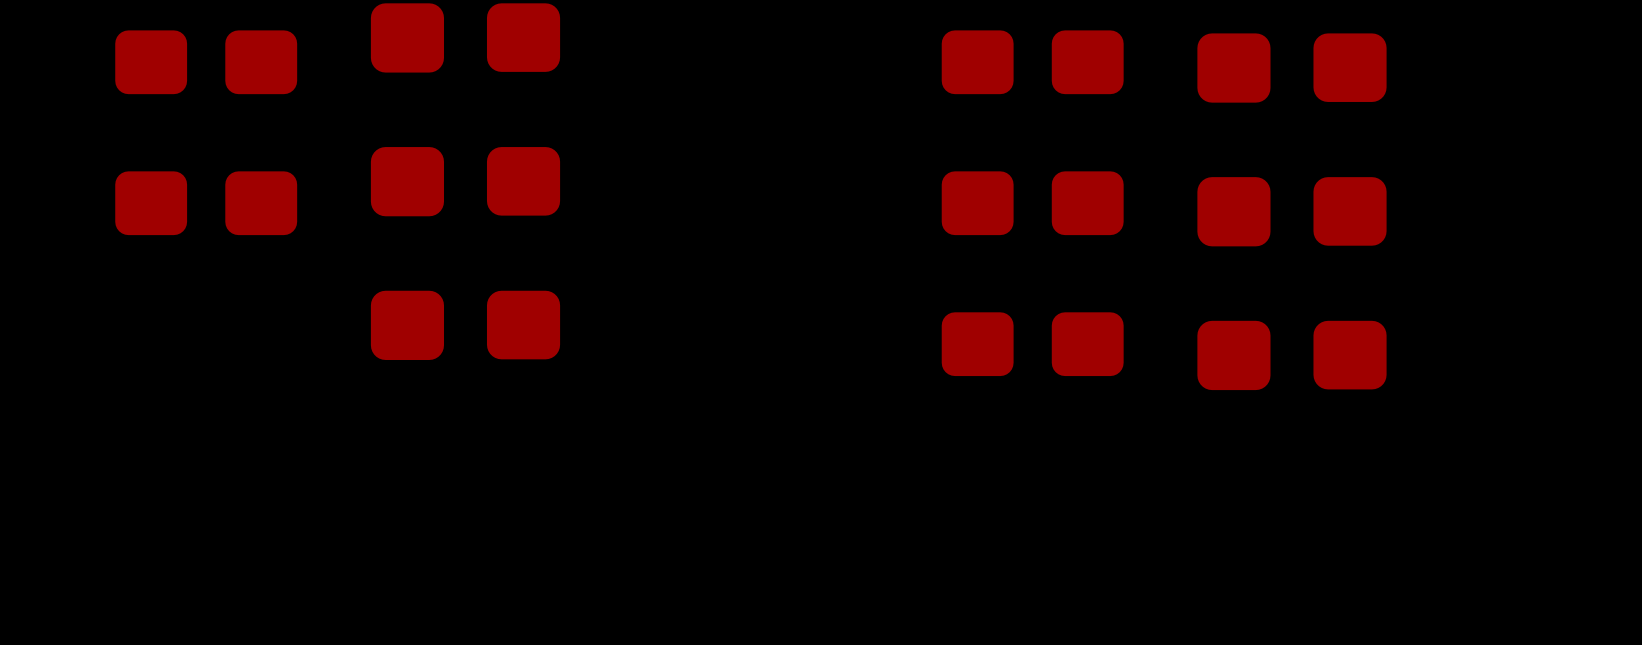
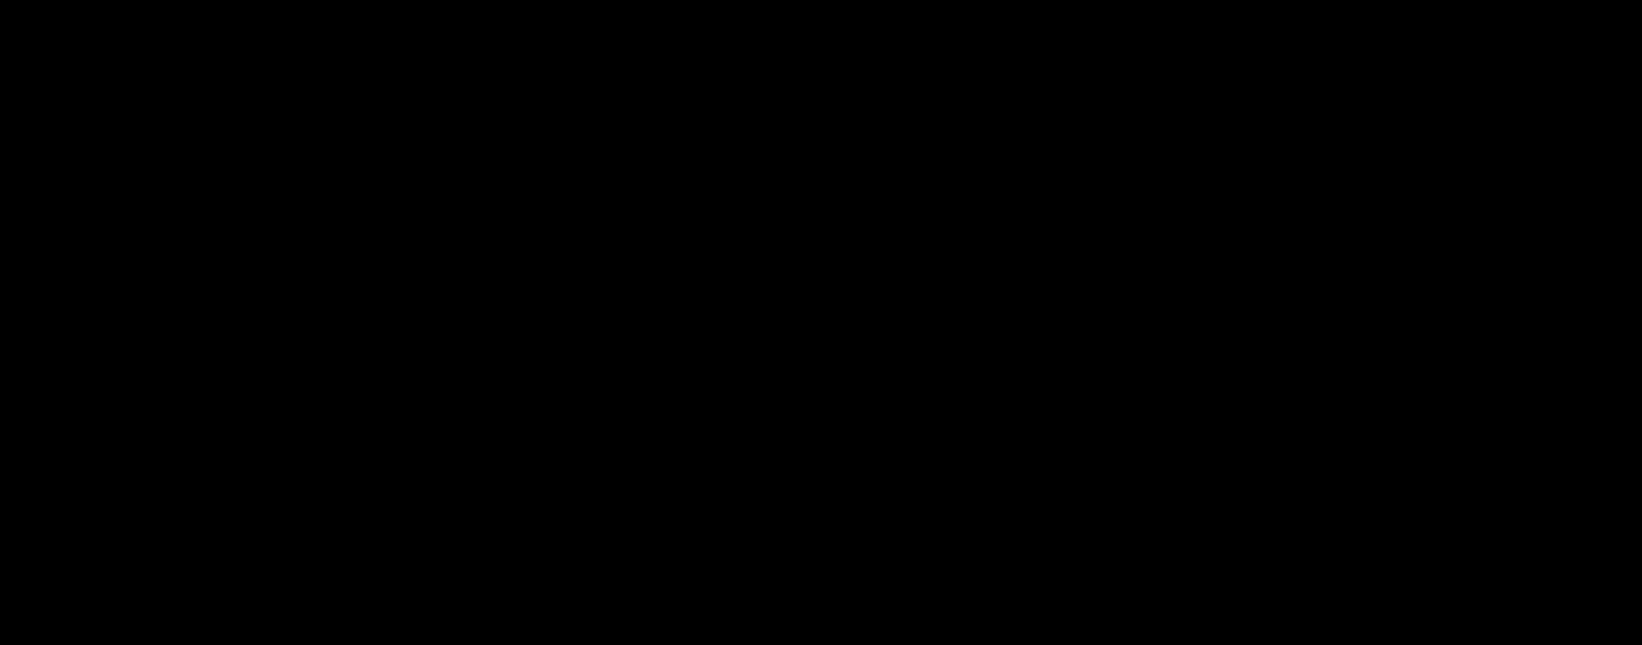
part: (465, 37) -> none
part: (206, 62) -> none
part: (1032, 62) -> none
part: (1291, 68) -> none
part: (465, 181) -> none
part: (206, 203) -> none
part: (1032, 203) -> none
part: (1291, 211) -> none
part: (465, 325) -> none
part: (1032, 344) -> none
part: (1291, 355) -> none

